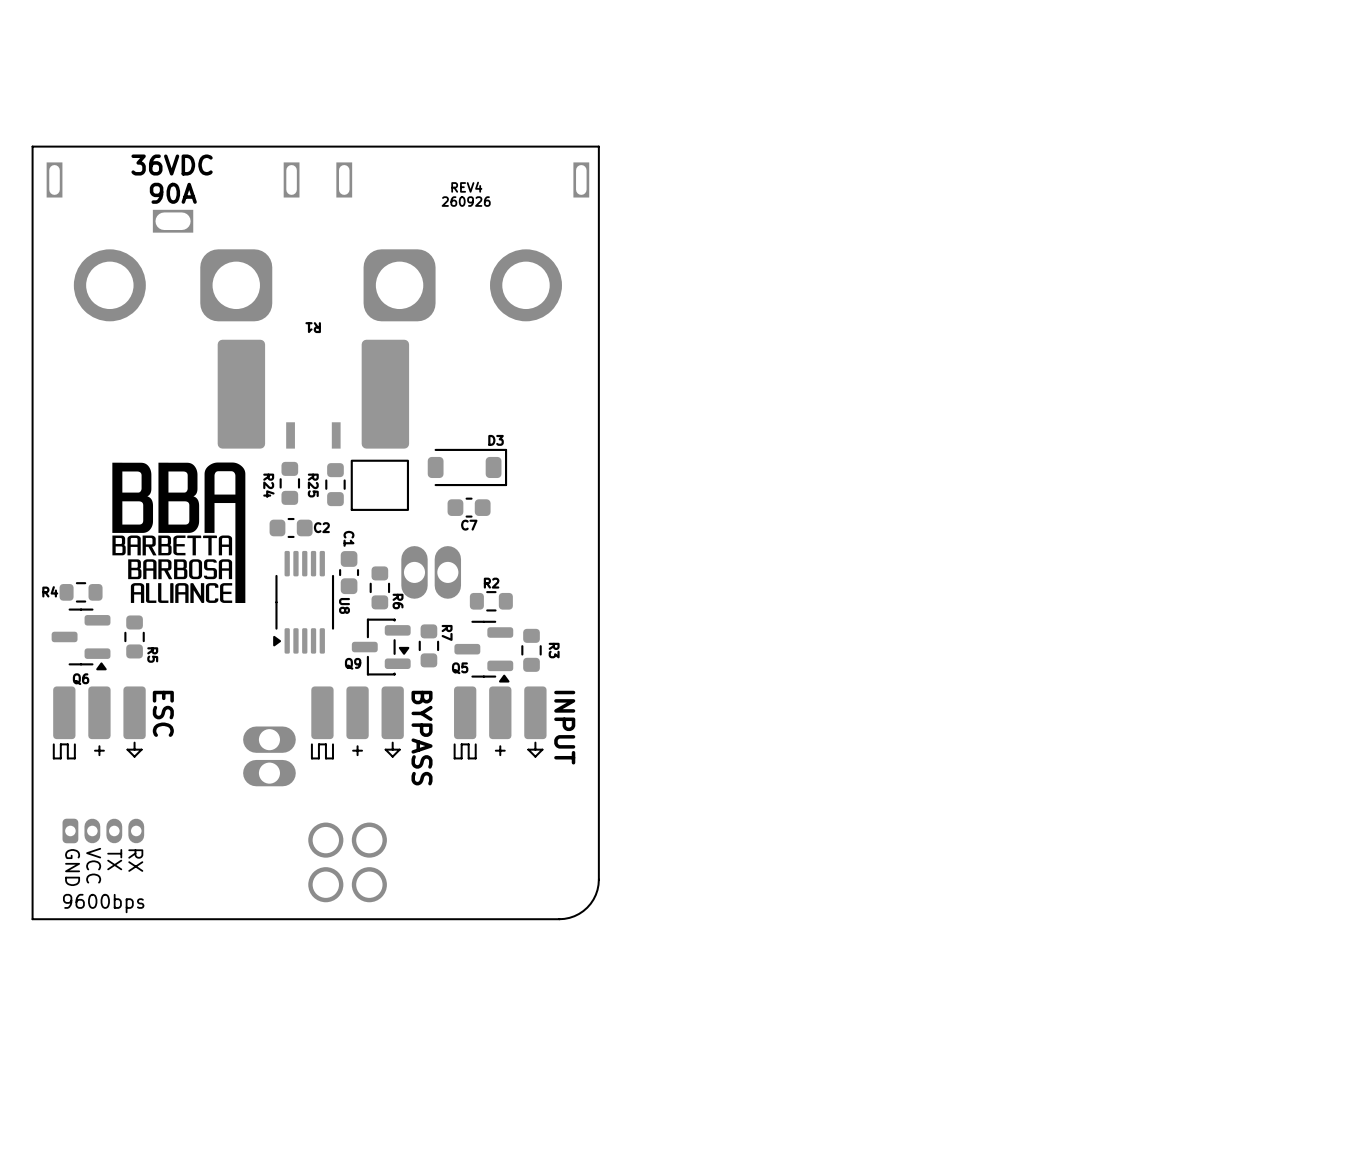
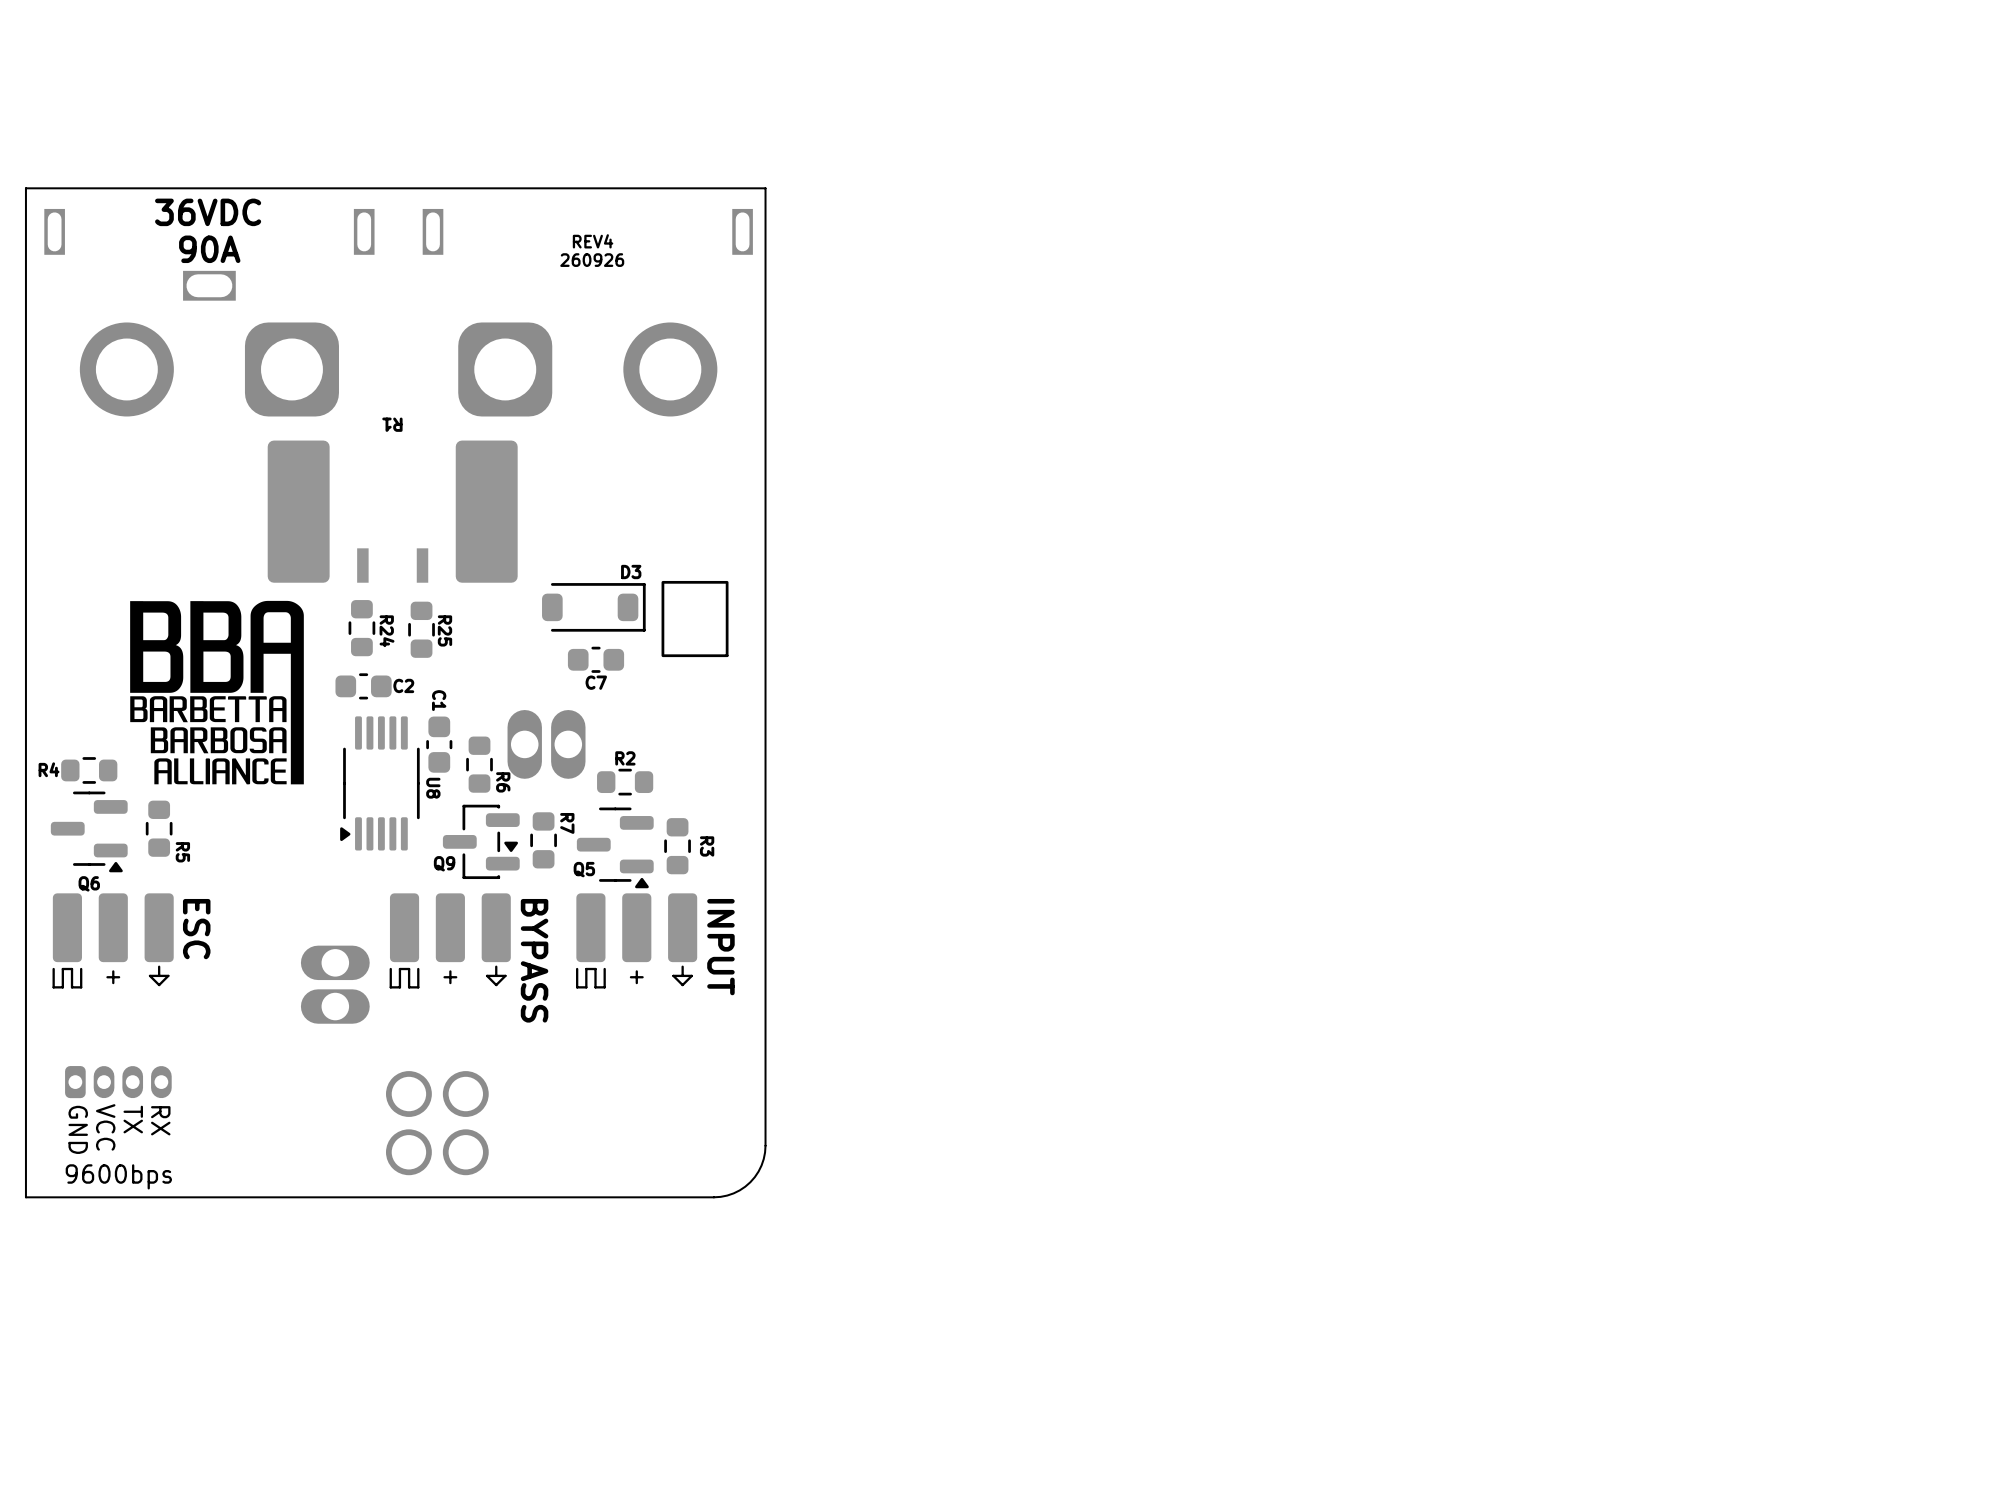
R24 name position: R24 (268, 485) -> R24 (387, 631)
R25 name position: R25 (313, 485) -> R25 (444, 630)
part rotation: 0° (379, 485) -> 90° clockwise (695, 619)
part position: (379, 485) -> (695, 619)

